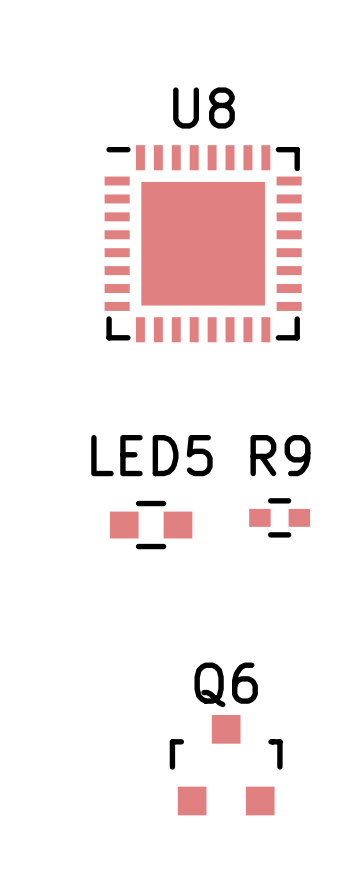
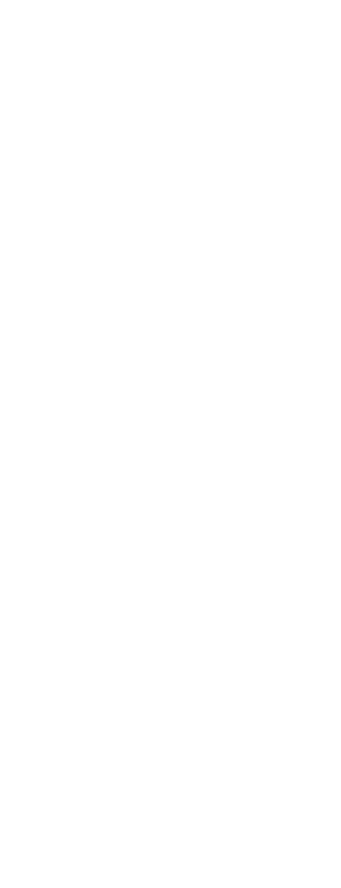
U8: (203, 243) -> none
R9: (279, 517) -> none
LED5: (151, 525) -> none
Q6: (226, 765) -> none

